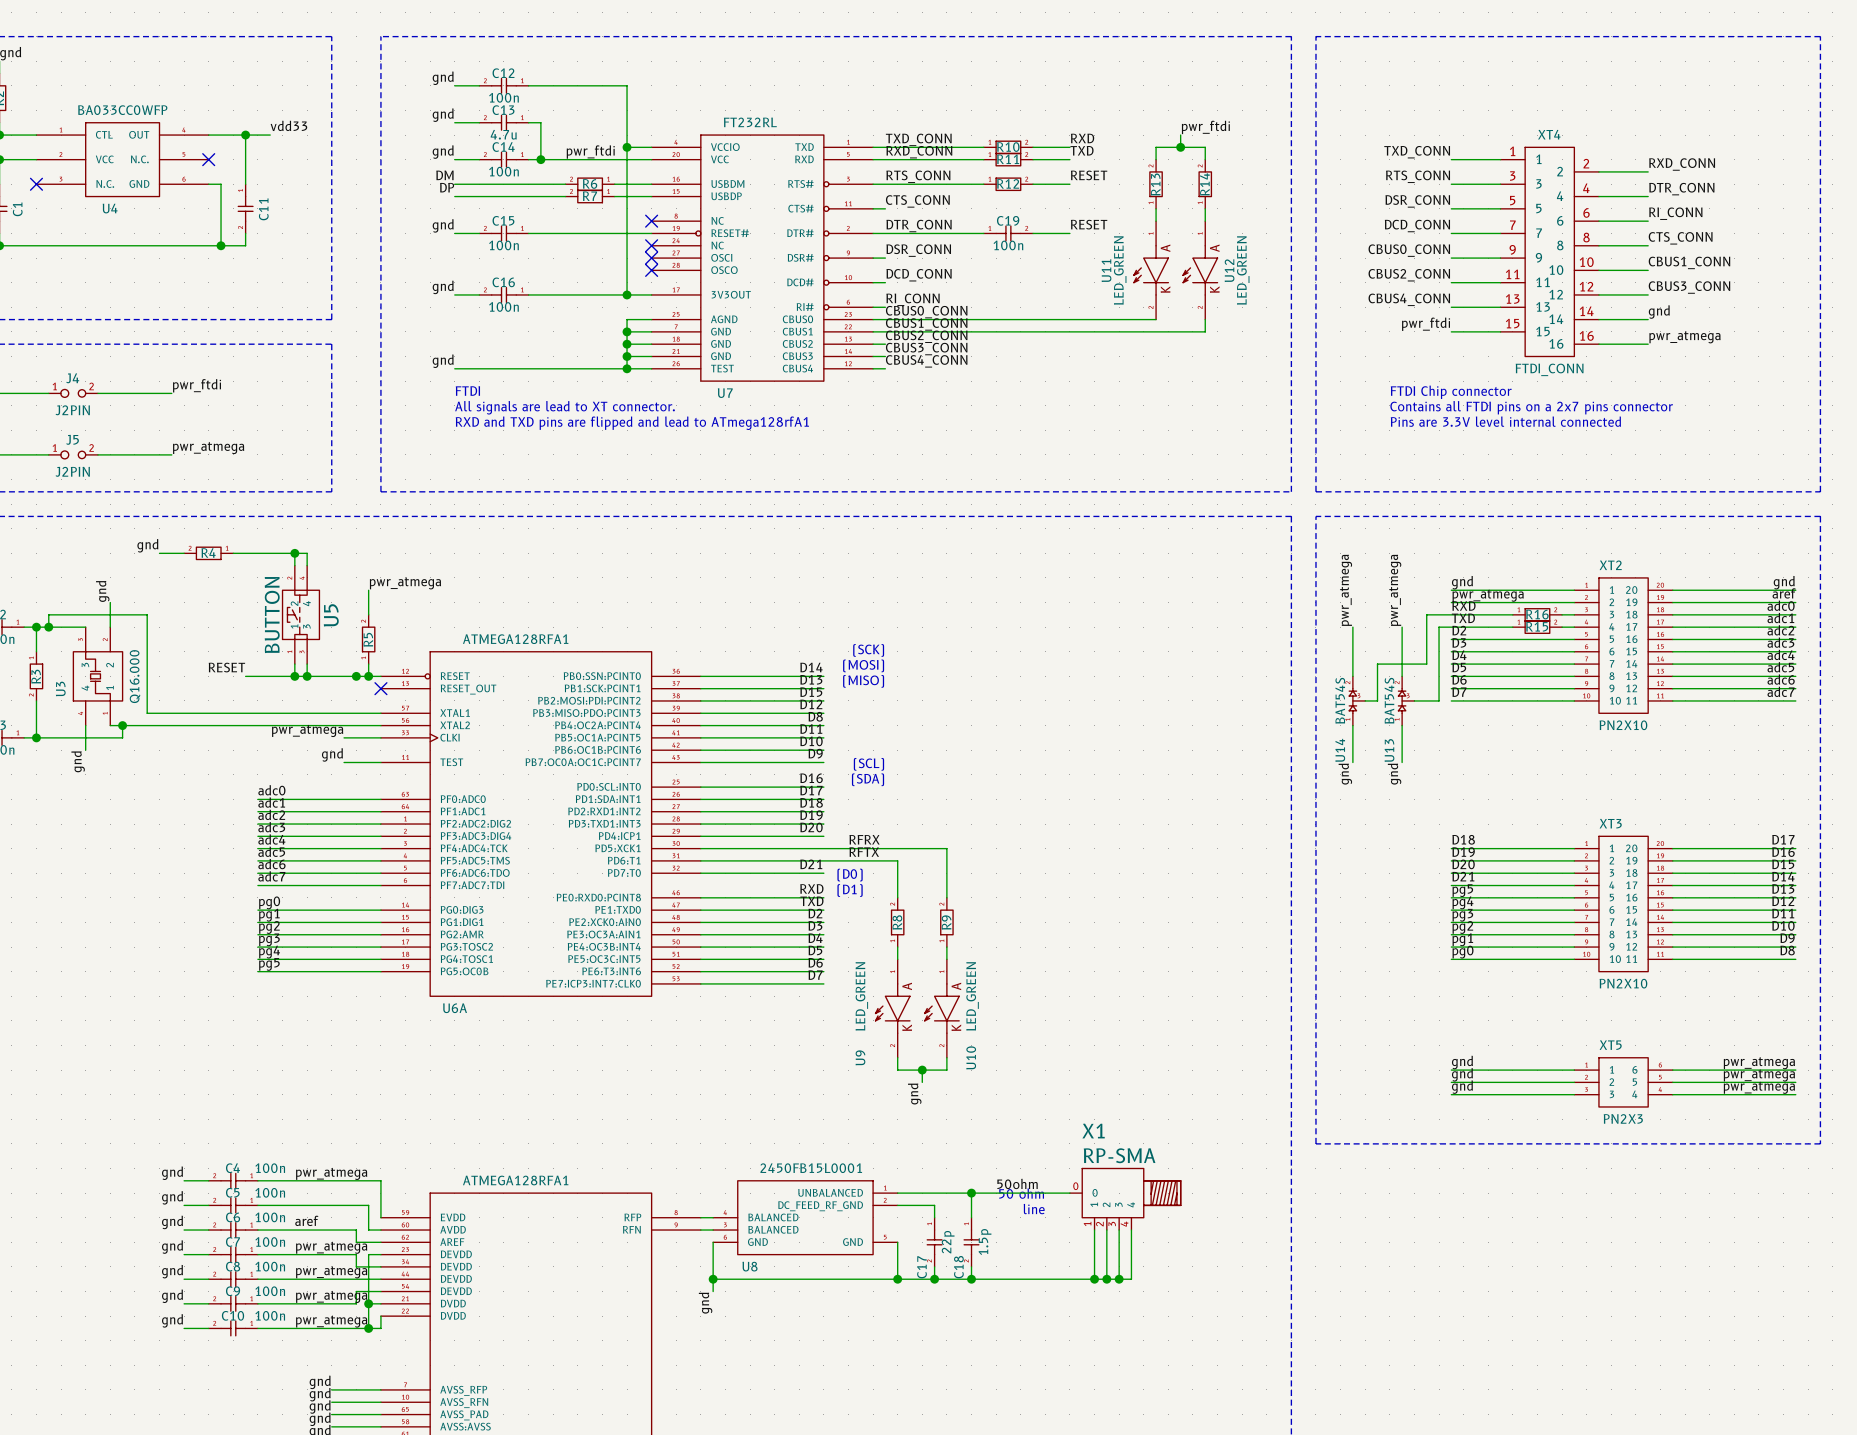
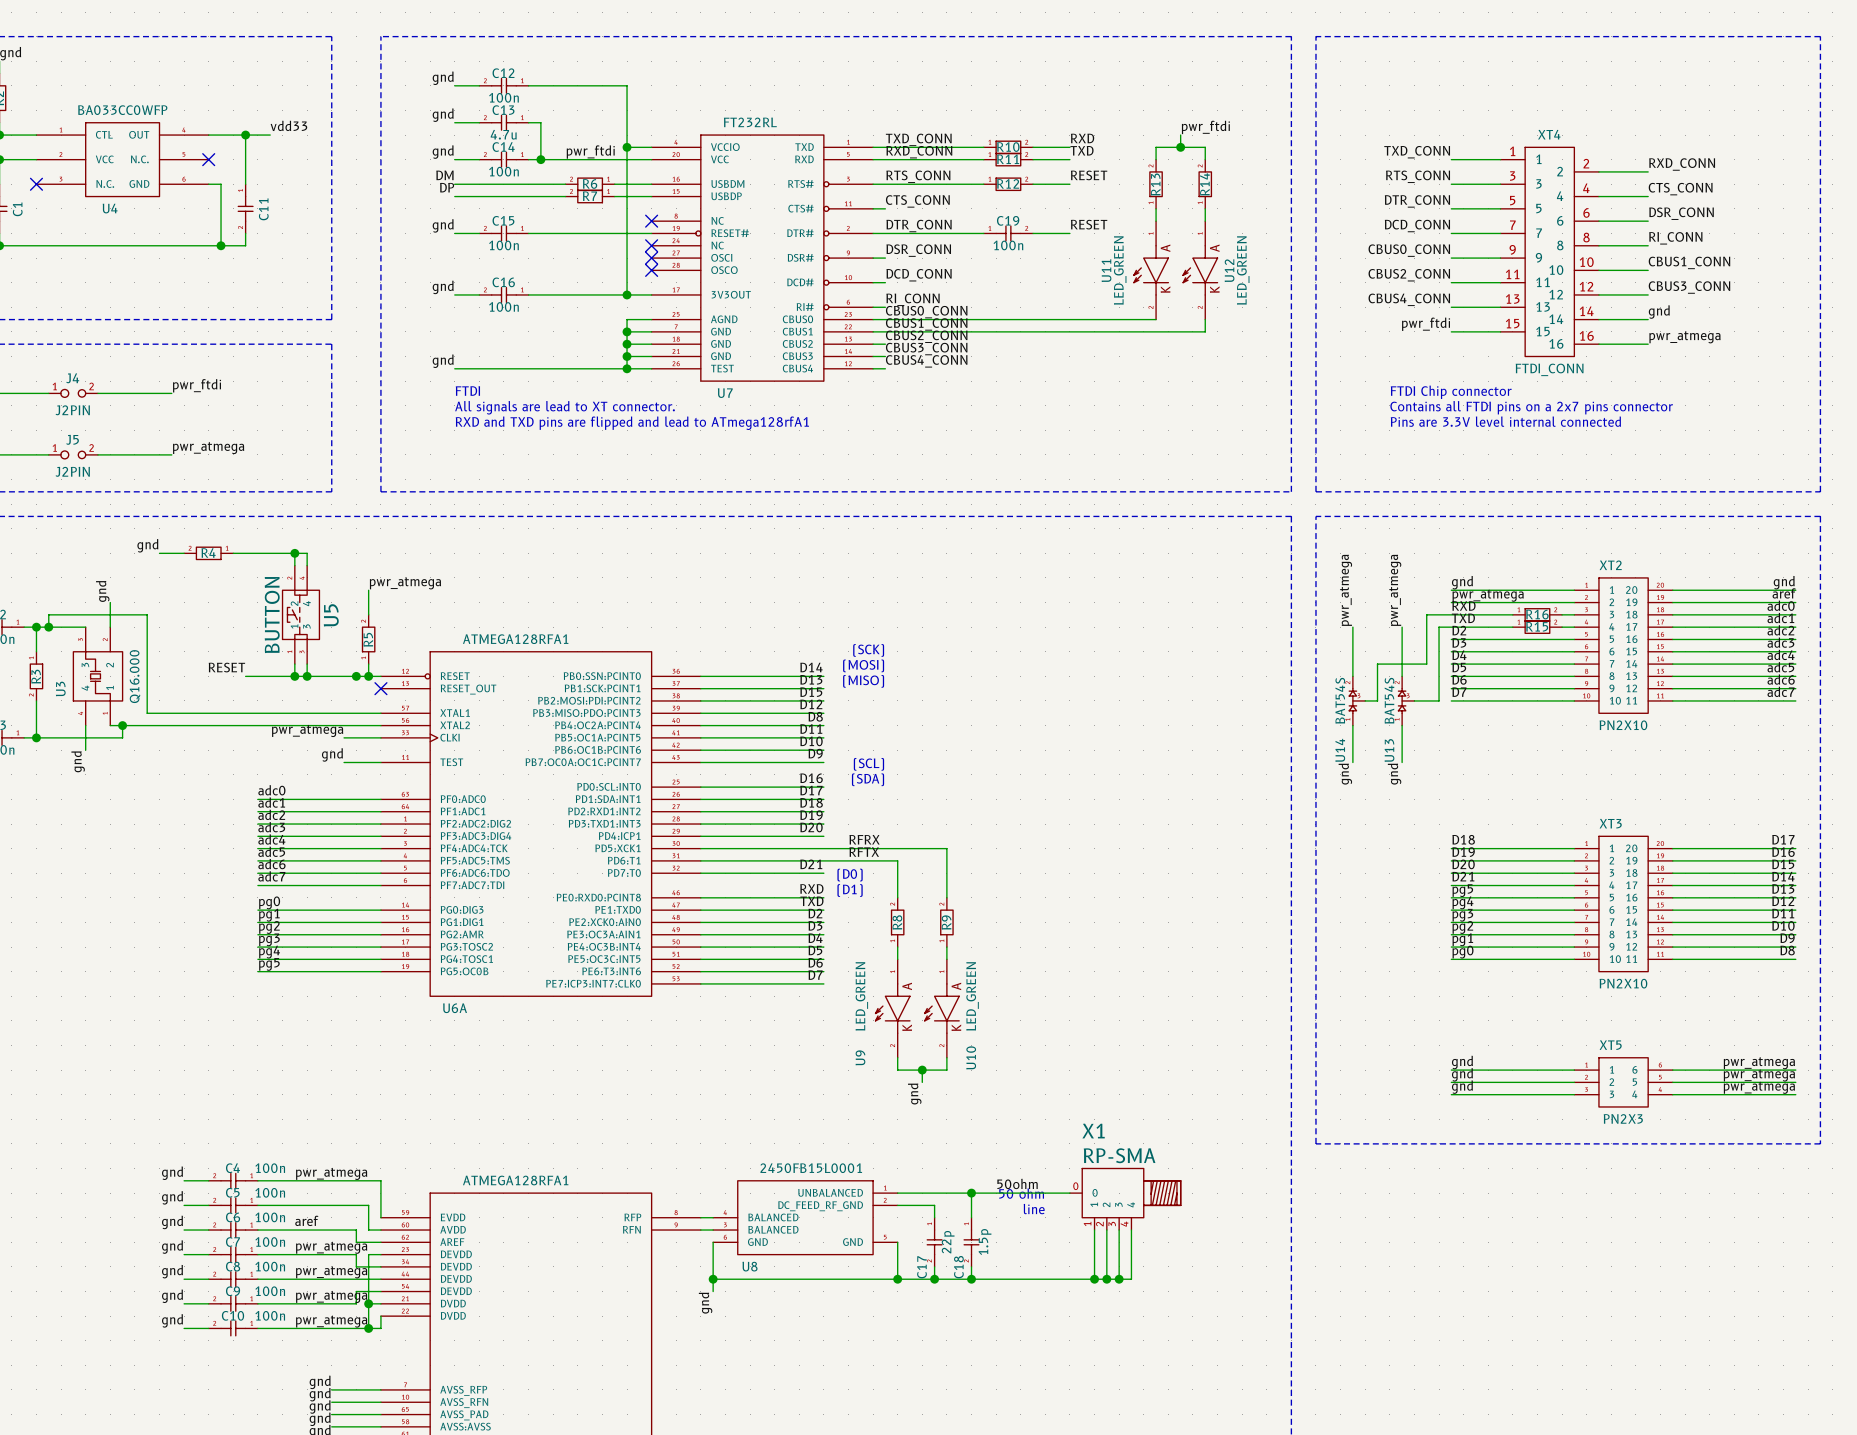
label: DTR_CONN (1681, 189) -> CTS_CONN (1680, 189)
label: DSR_CONN (1417, 201) -> DTR_CONN (1417, 201)
label: RI_CONN (1675, 213) -> DSR_CONN (1681, 213)
label: CTS_CONN (1680, 238) -> RI_CONN (1675, 238)

